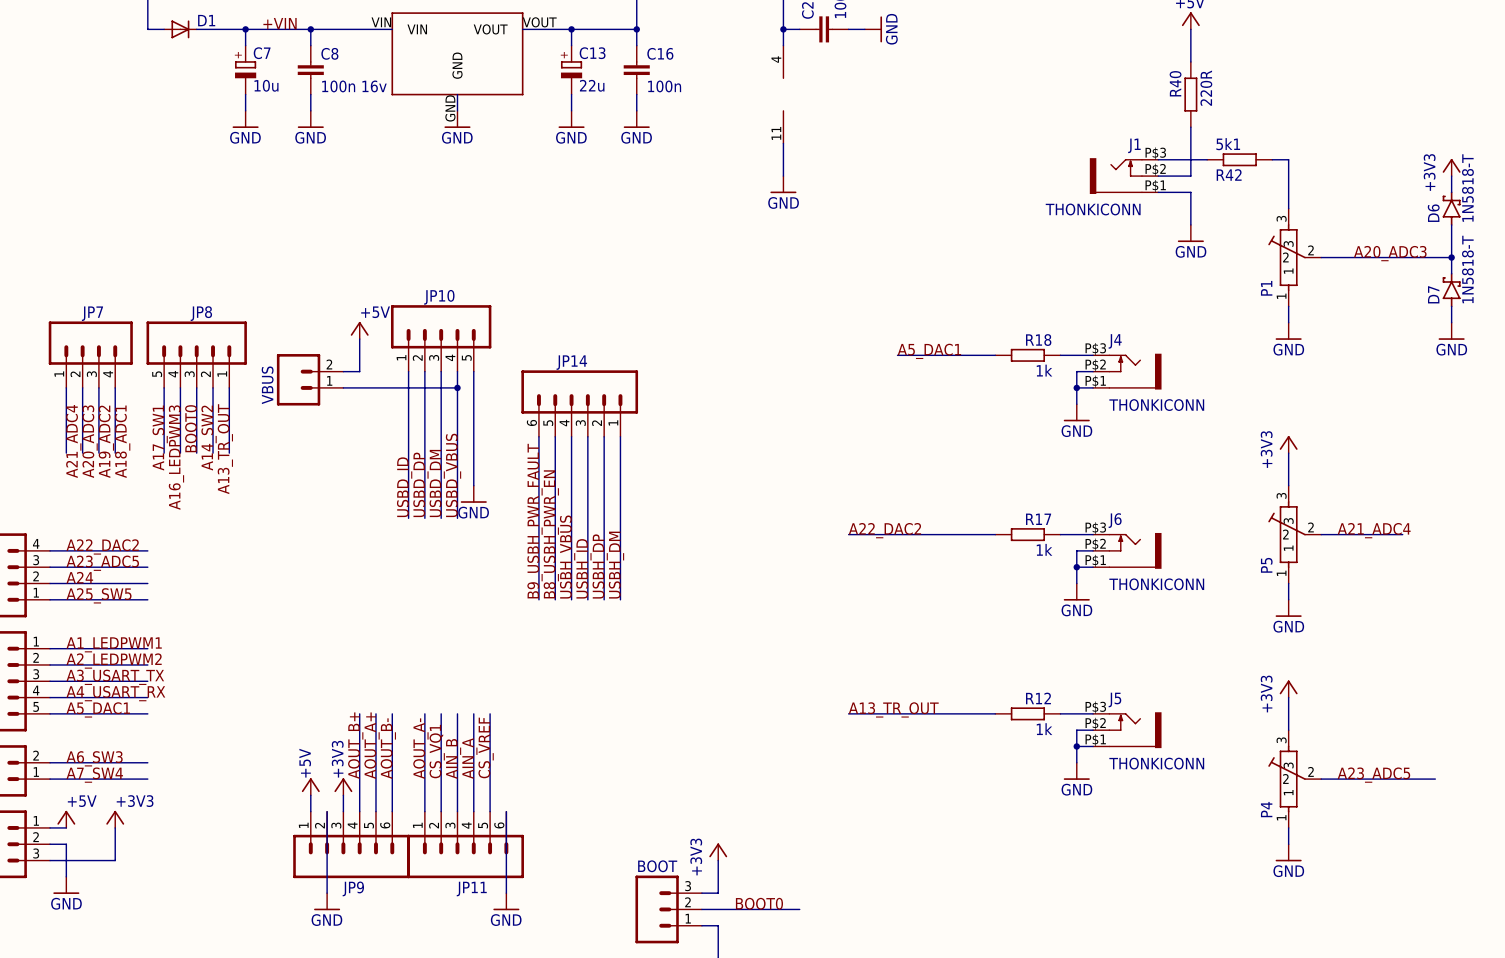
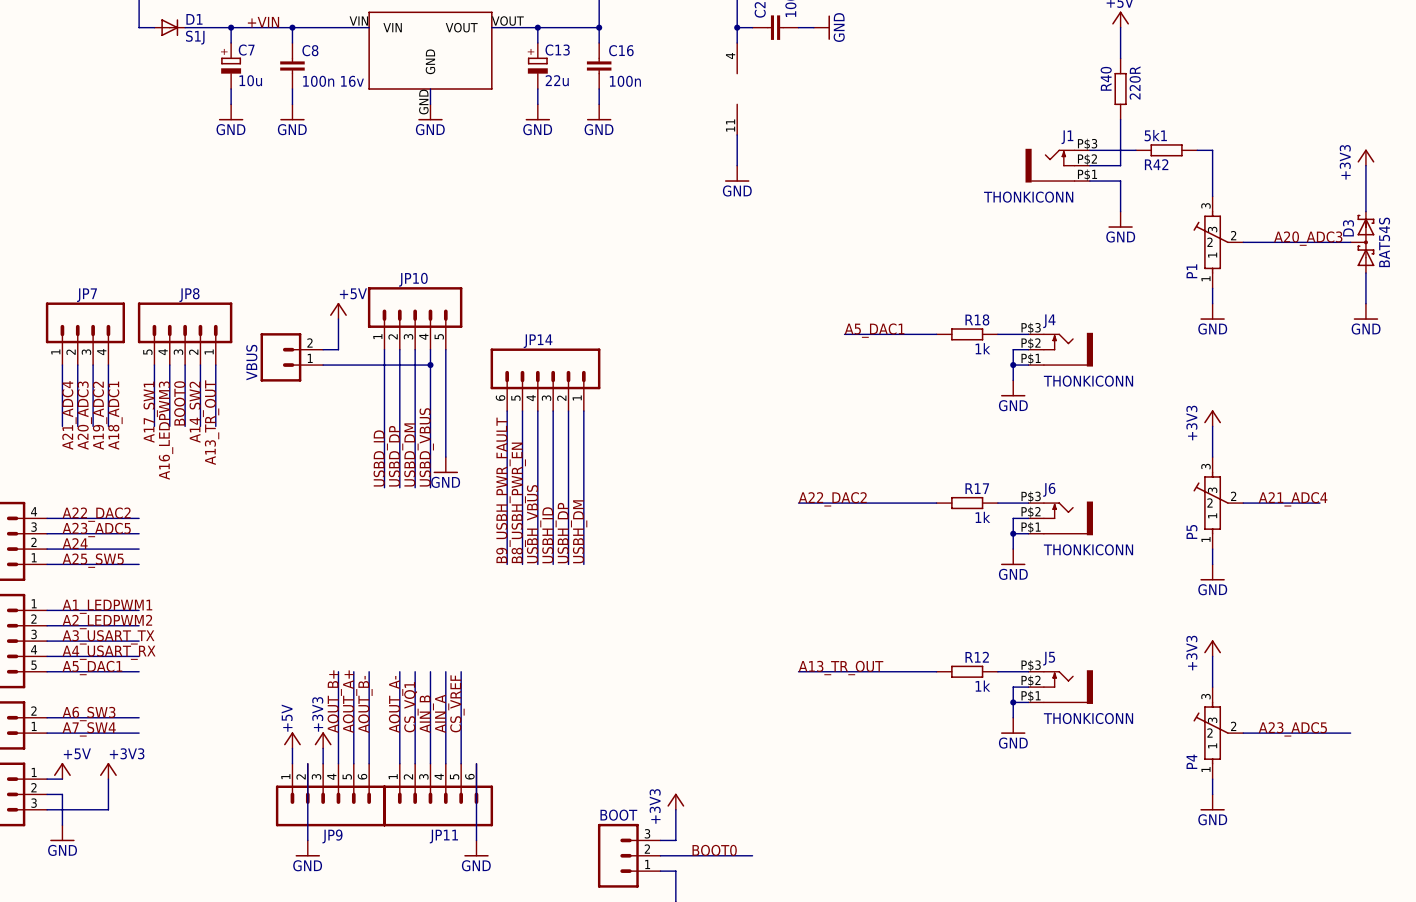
D1 value: none -> S1J (195, 37)
D6: 1N5818-T (1451, 208) -> none
D3: none -> BAT54S (1362, 242)
junction: (1451, 257) -> none
D7: 1N5818-T (1451, 290) -> none

